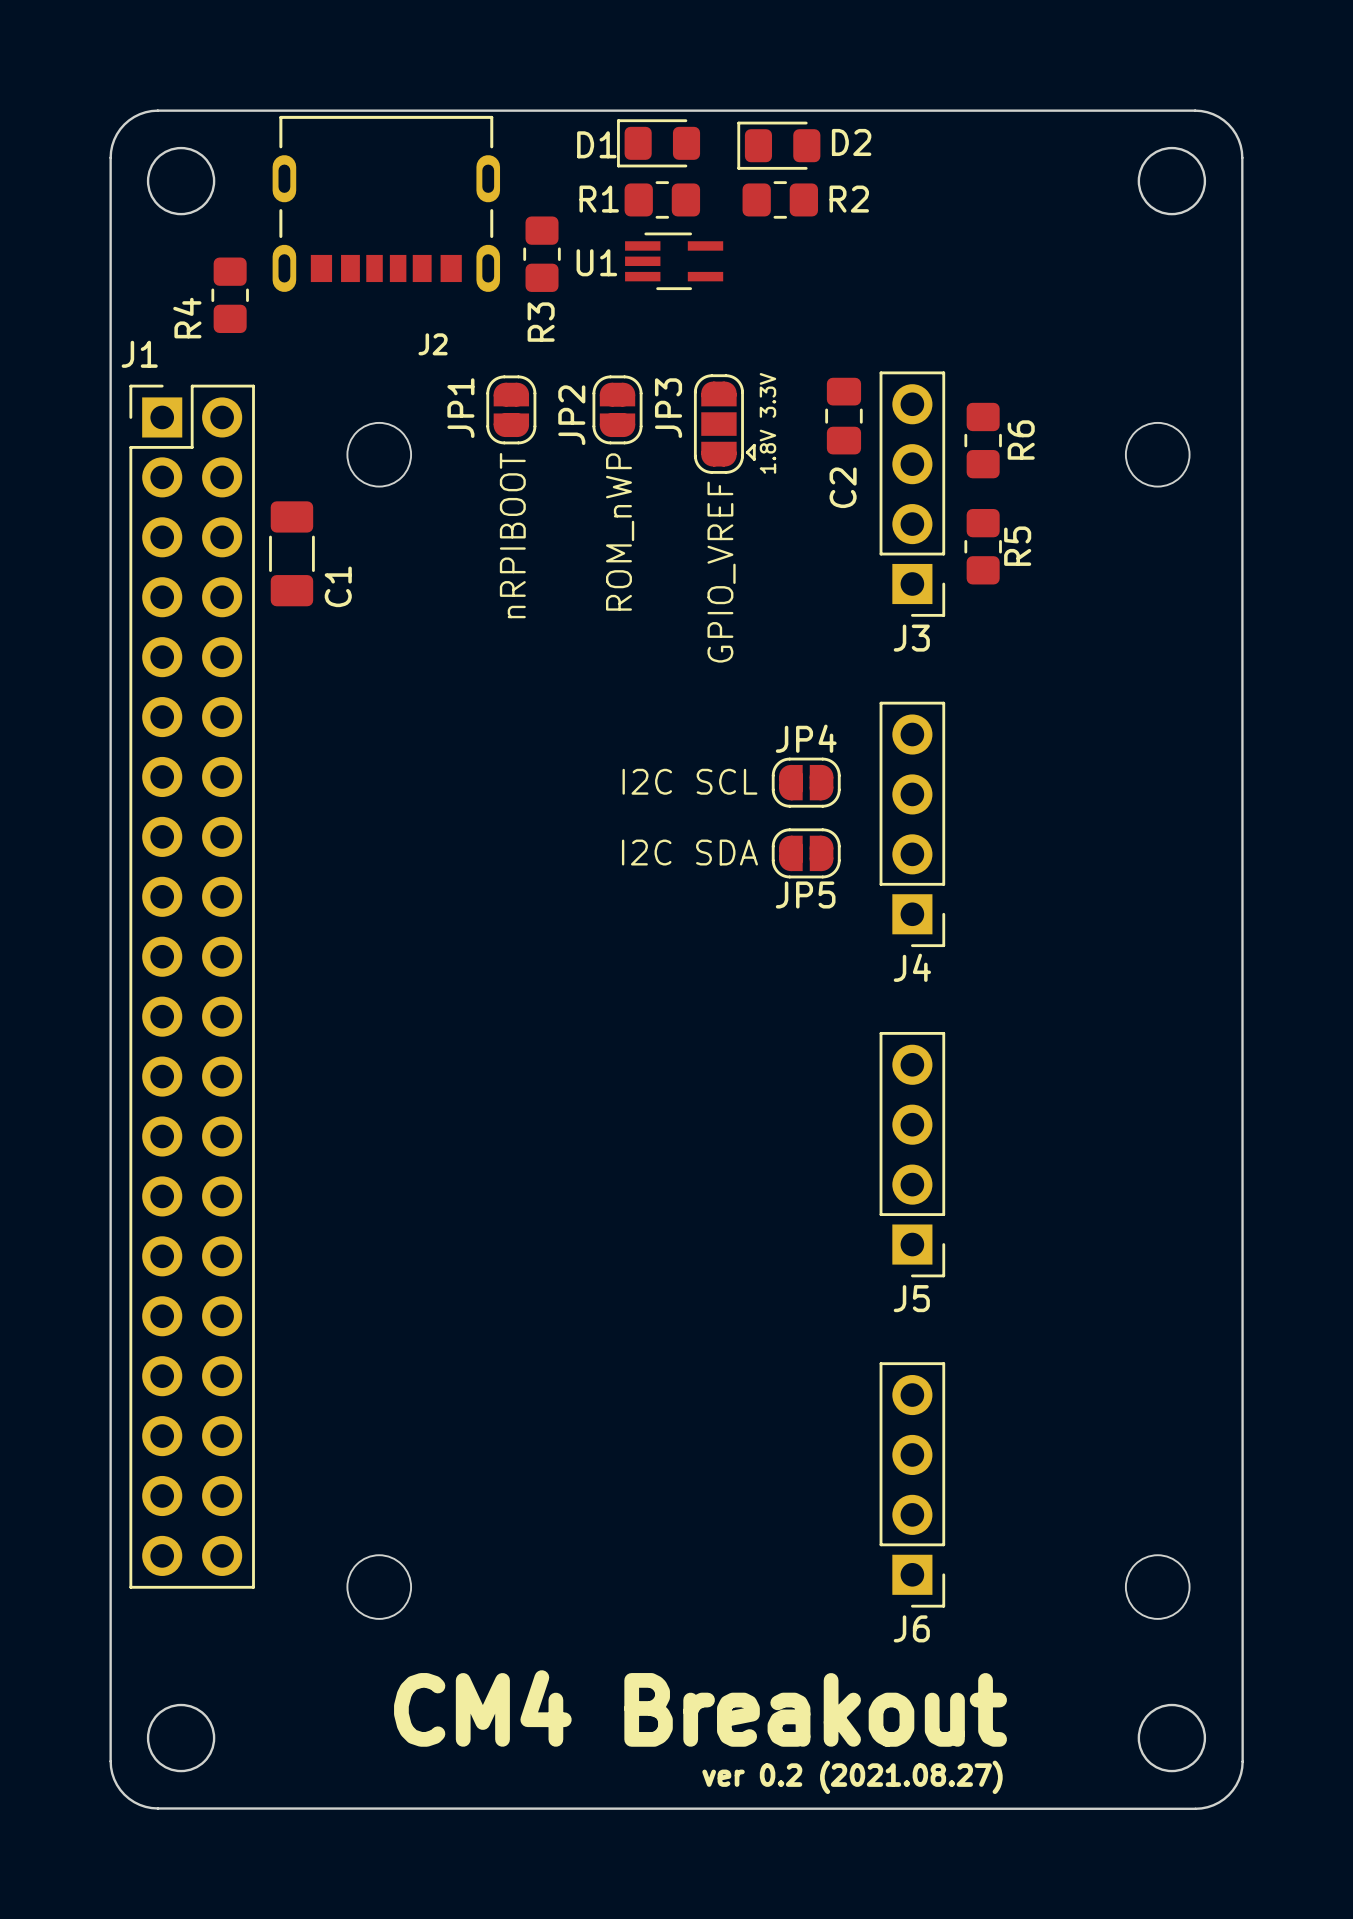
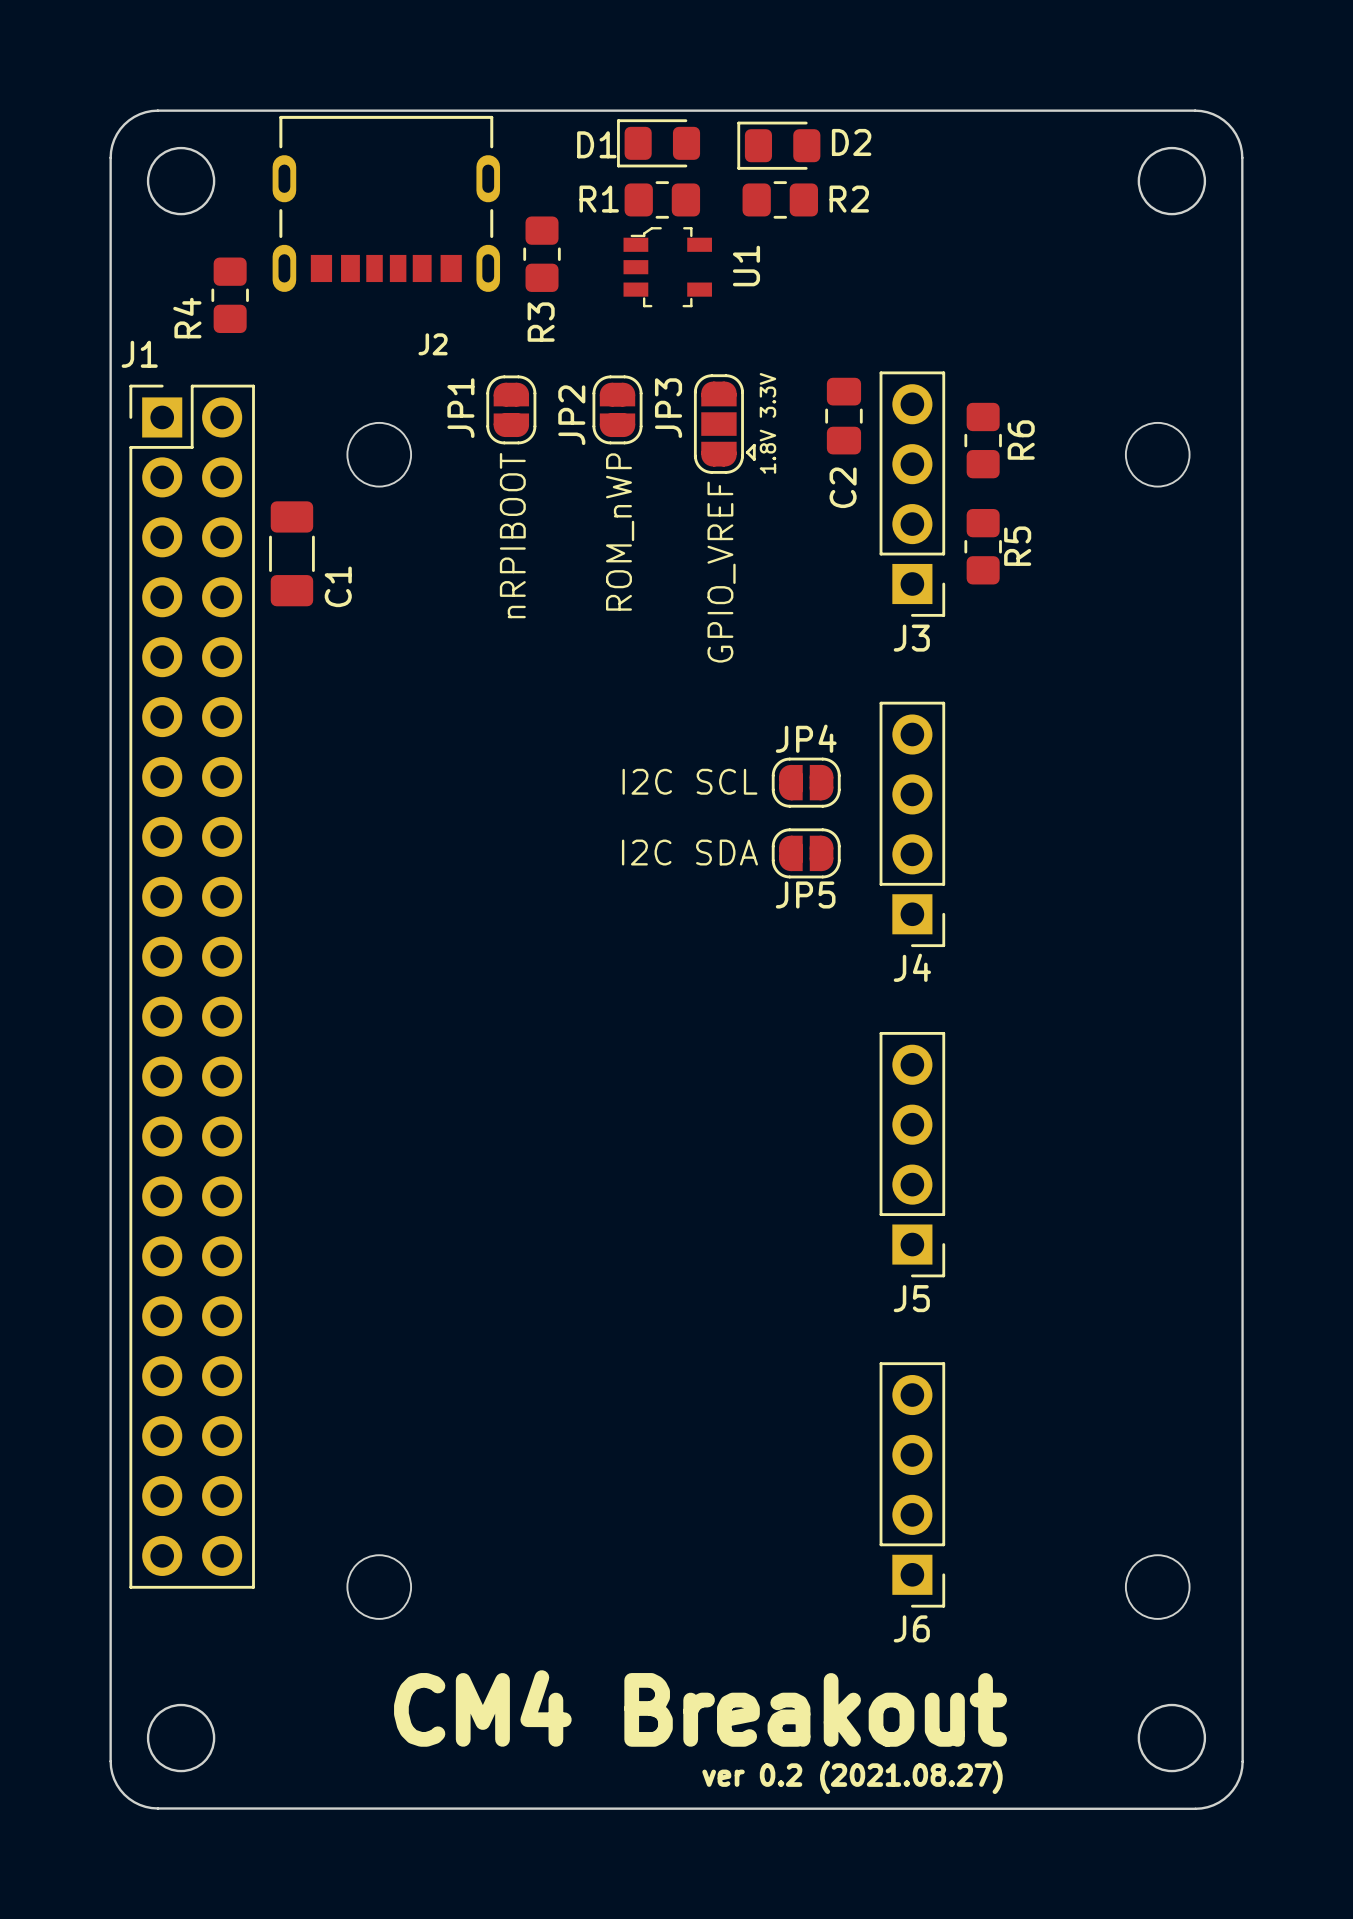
U1 footprint: [625, 232, 724, 291] -> [623, 227, 712, 308]
U1 name rotation: 0° (596, 262) -> 90° counterclockwise (746, 266)
U1 name position: U1 (596, 262) -> U1 (746, 266)

